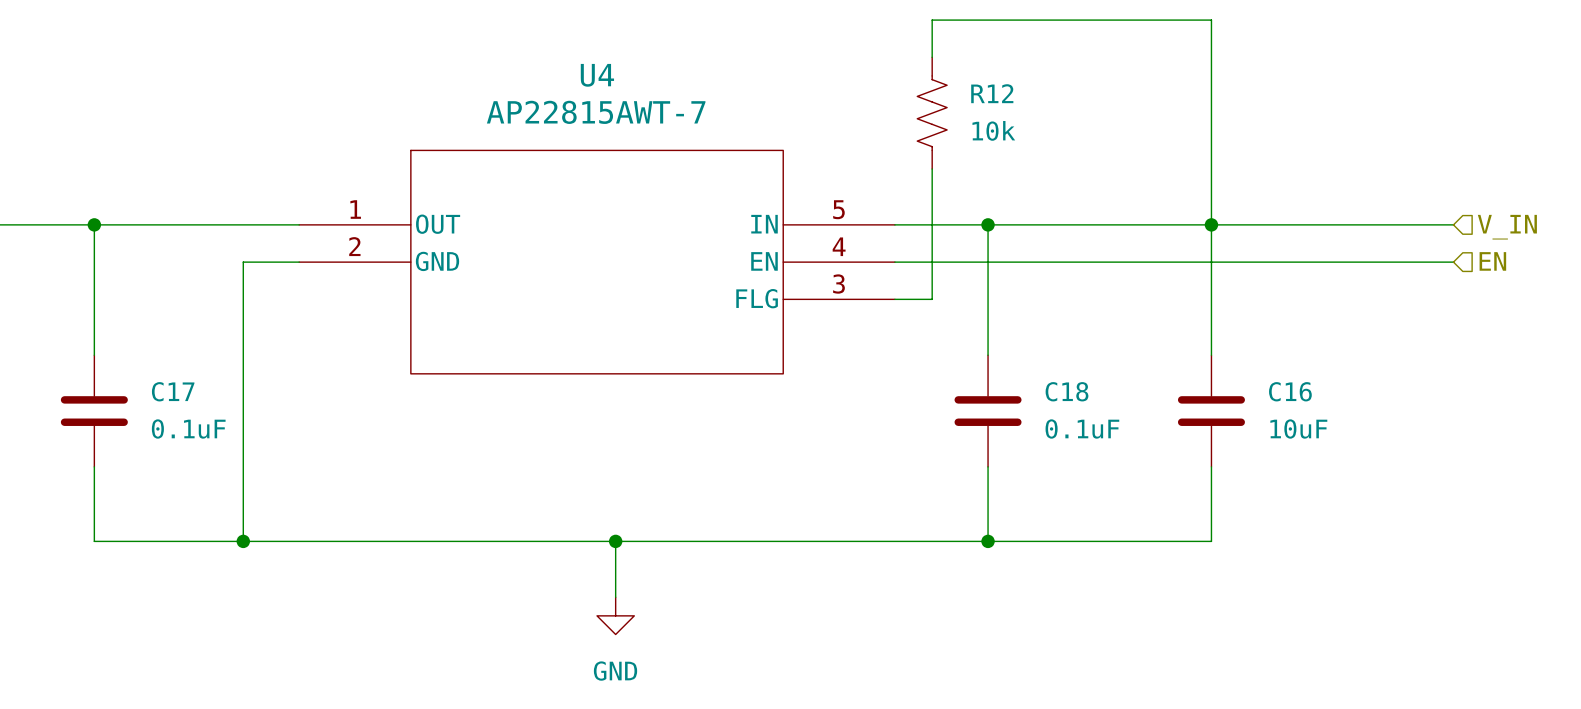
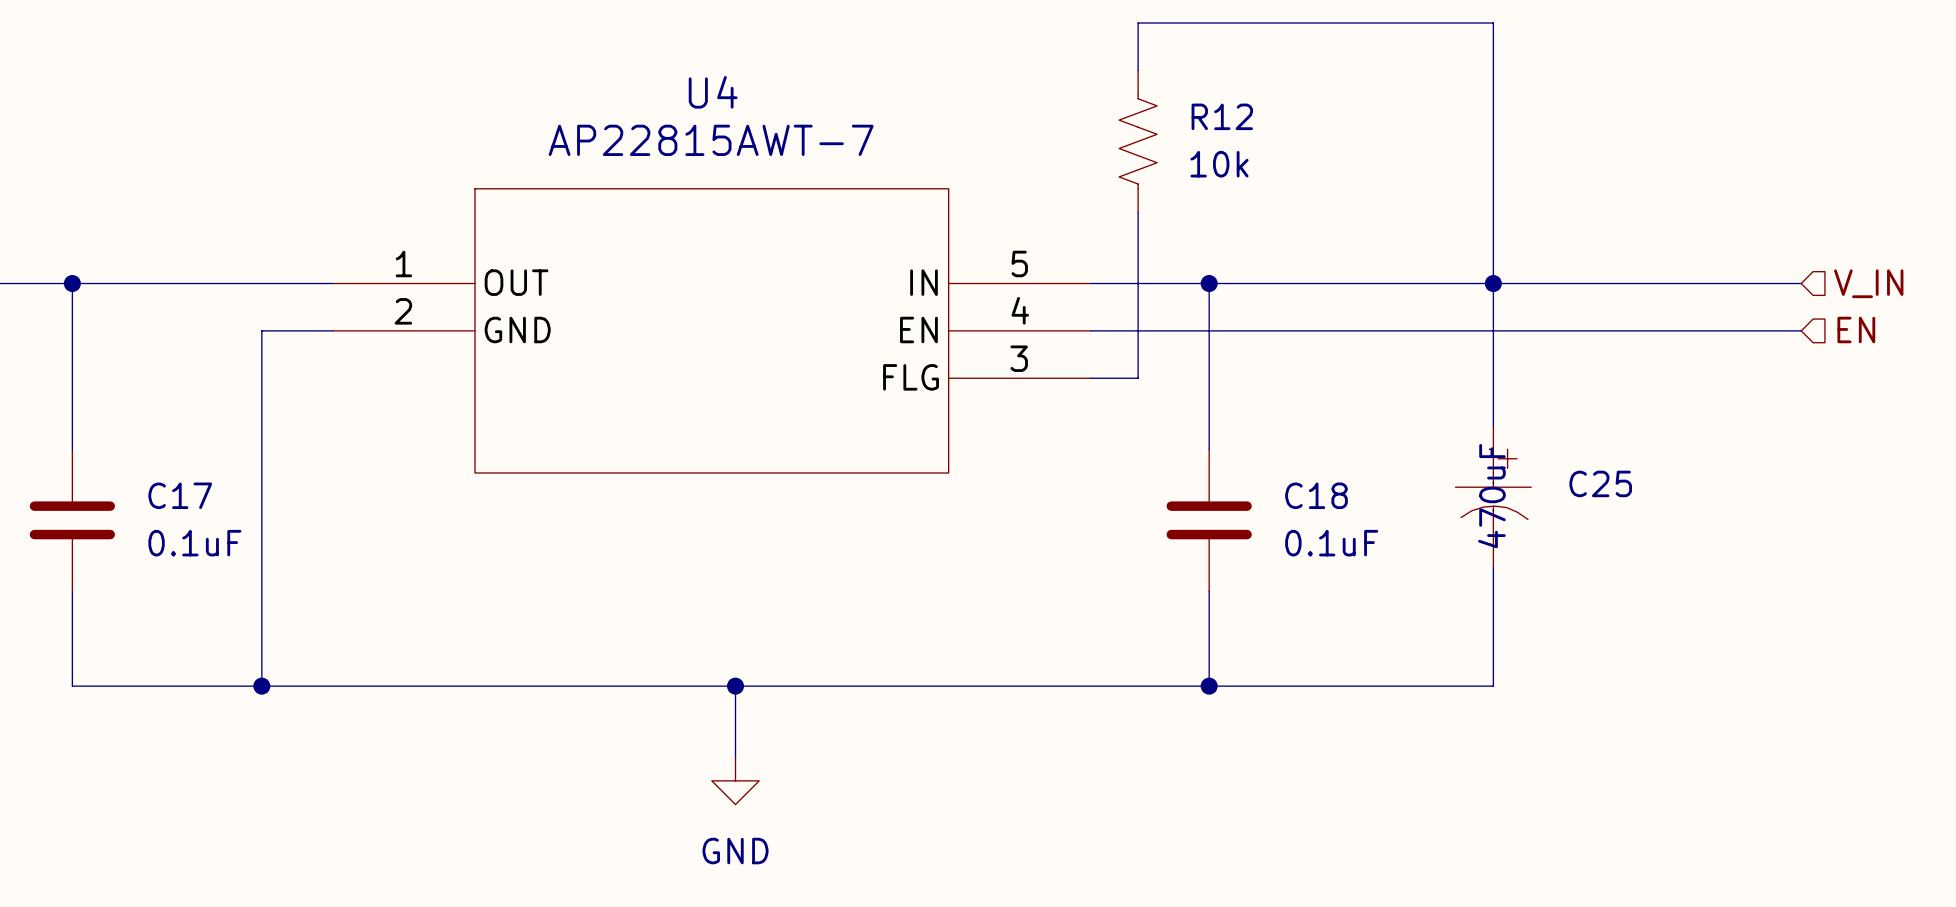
C25: none -> 470uF (1493, 496)
C16: 10uF (1211, 411) -> none

